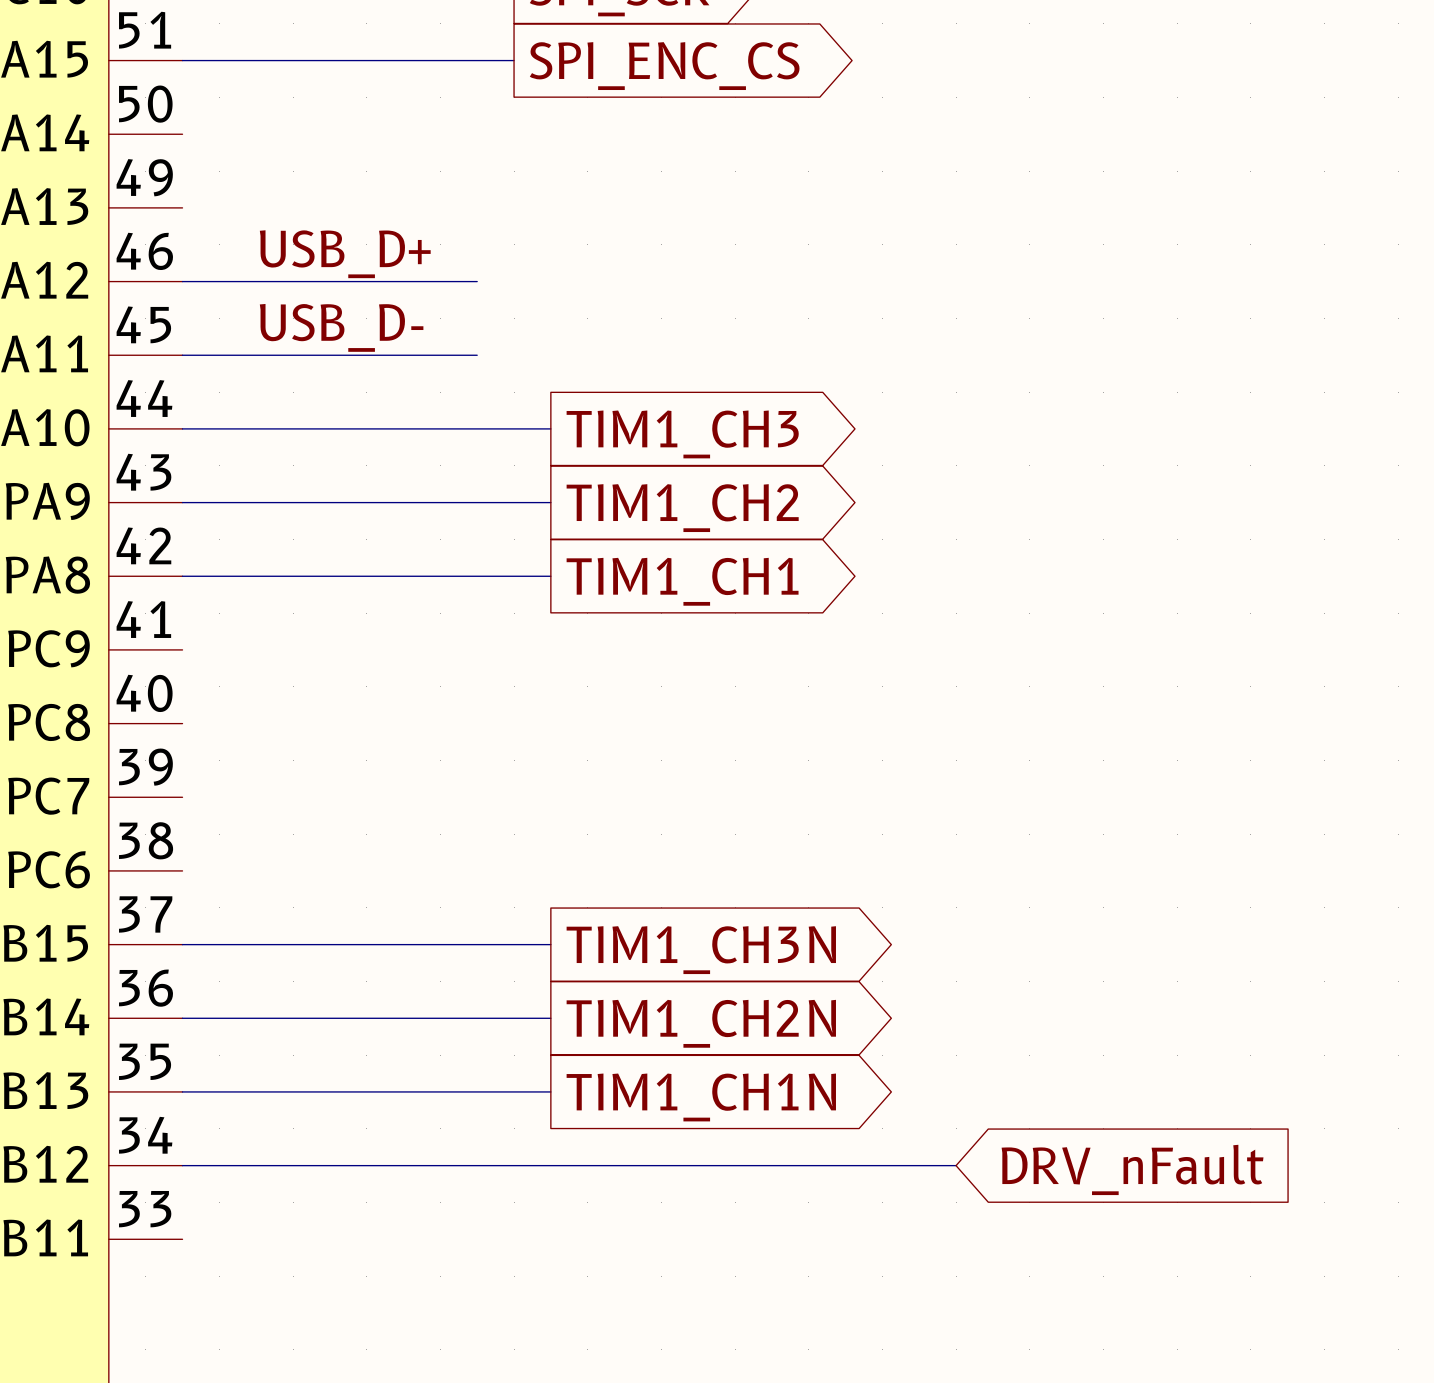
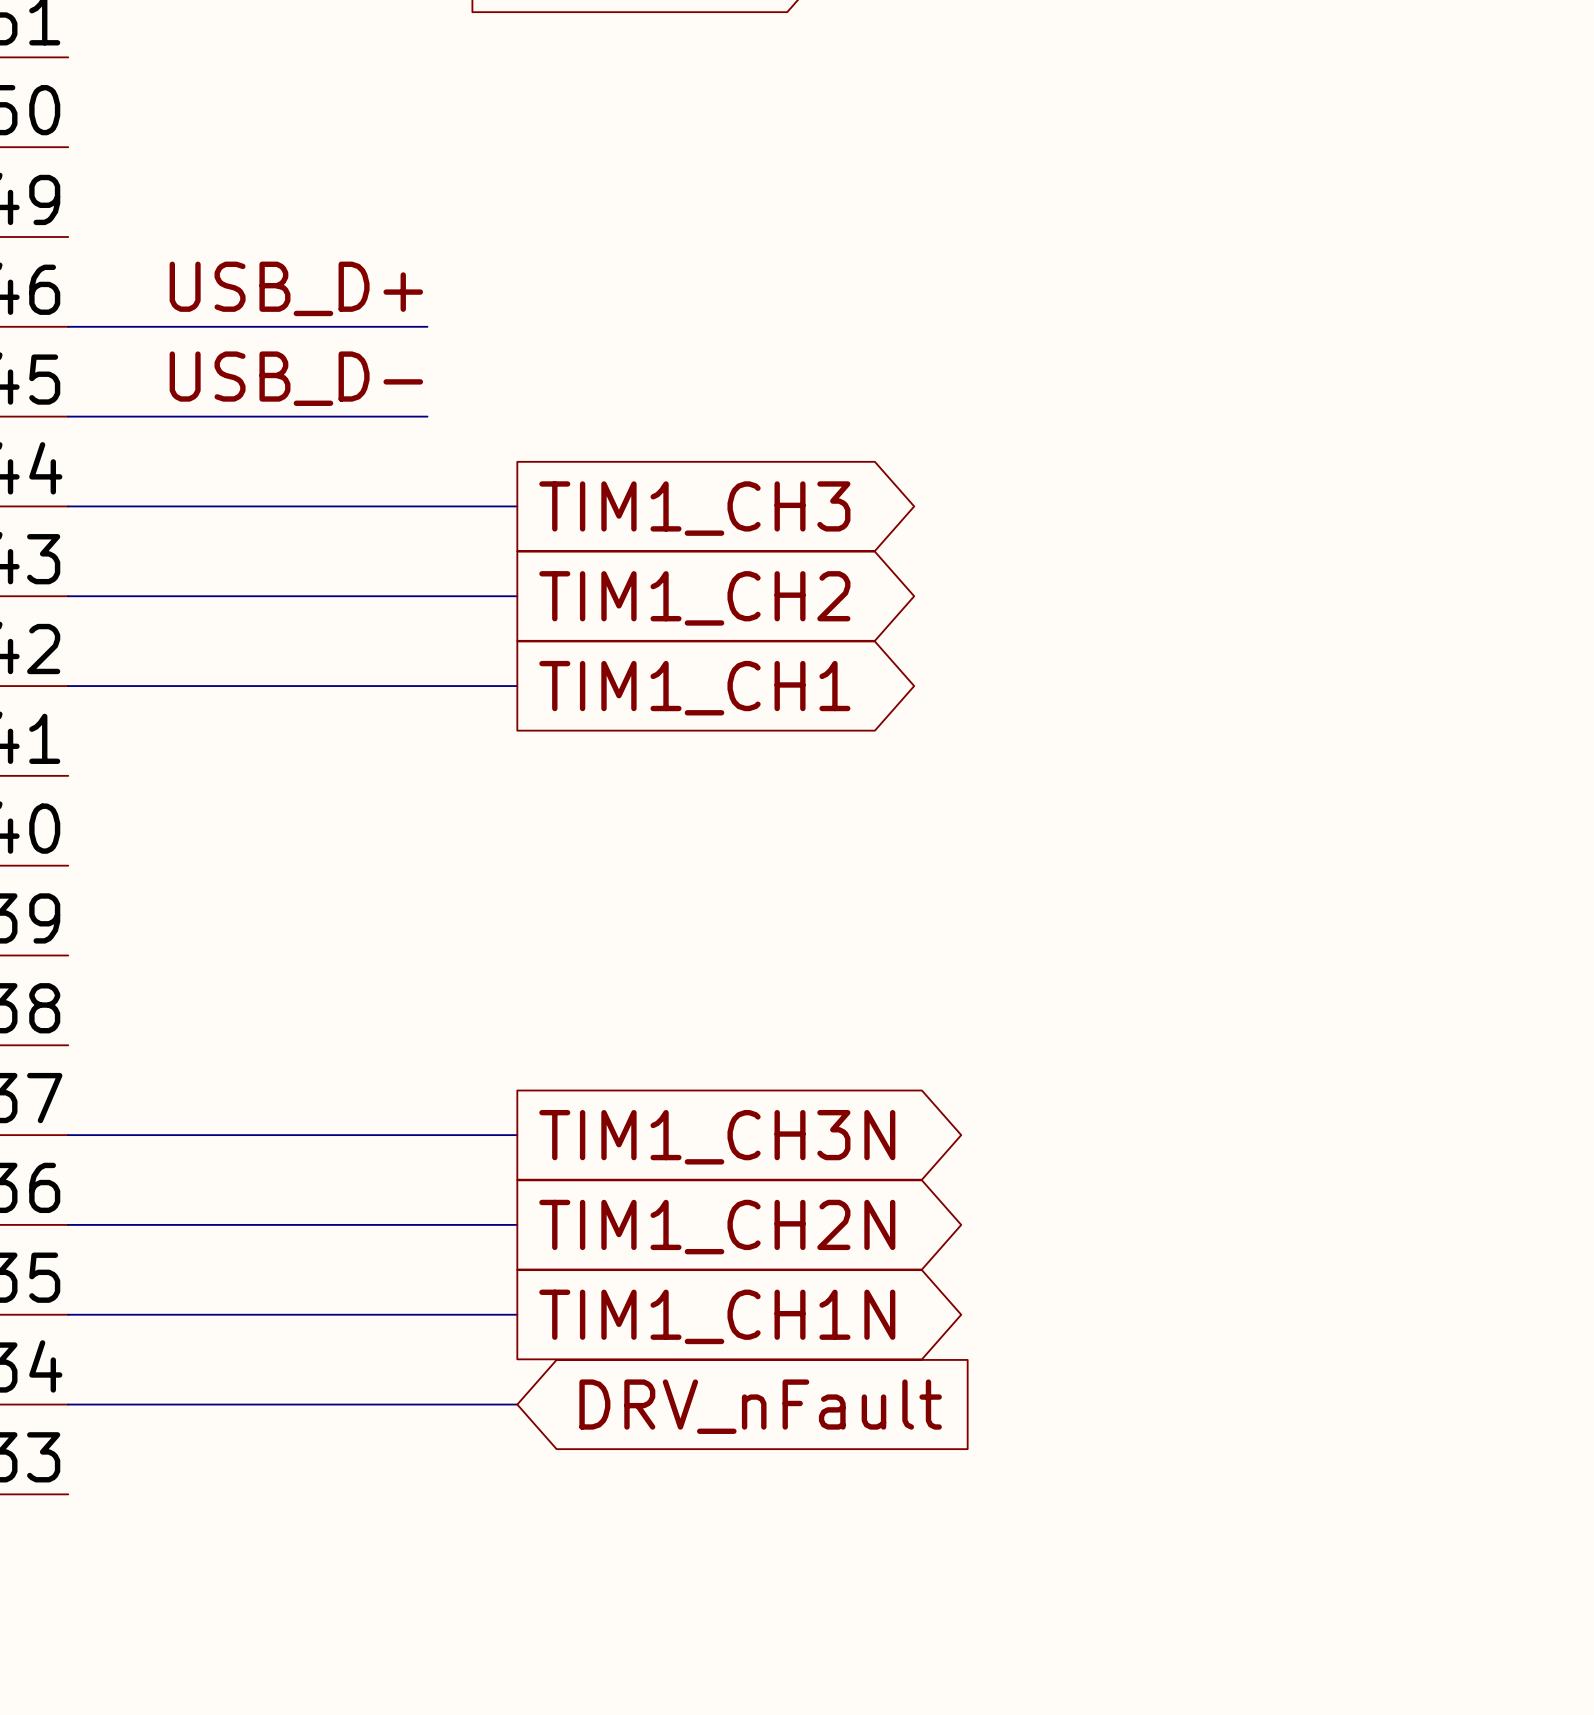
wire: (182, 60) (514, 60) -> none
global label: SPI_ENC_CS (664, 66) -> none
wire: (550, 1165) (956, 1165) -> none
global label position: DRV_nFault (1132, 1169) -> DRV_nFault (760, 1406)

